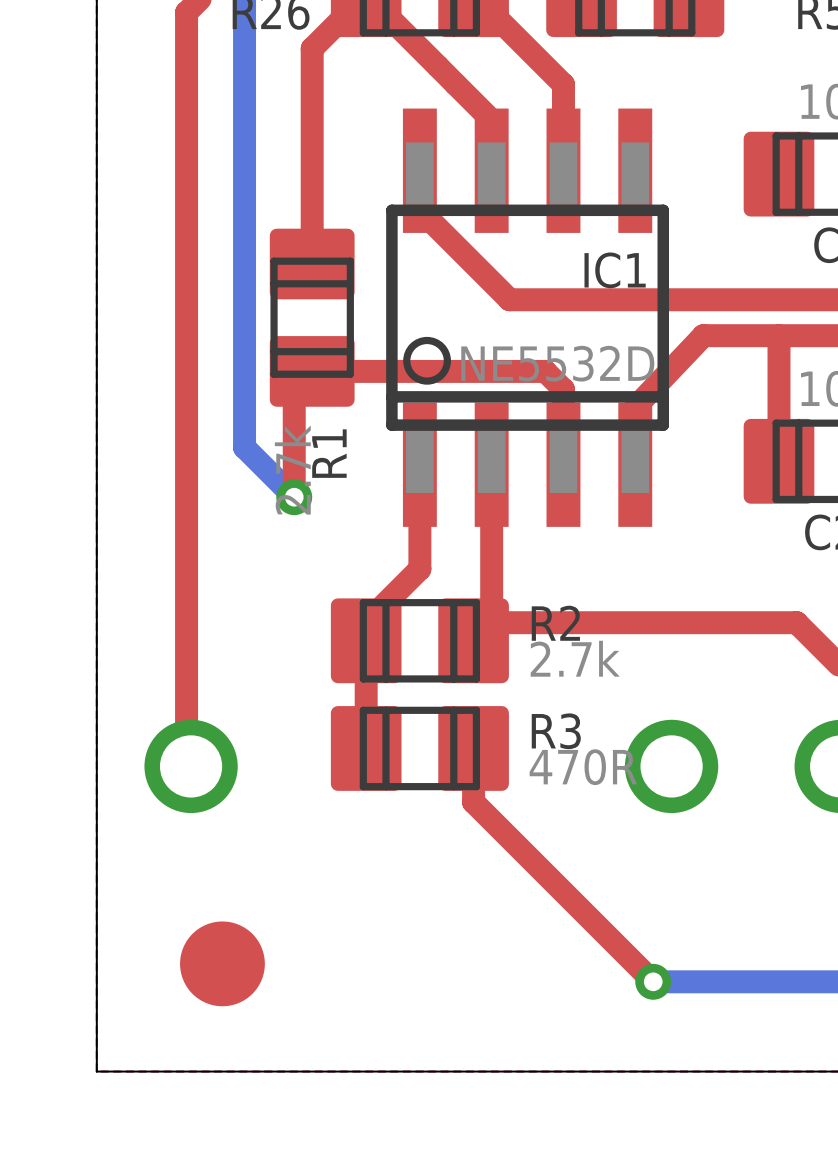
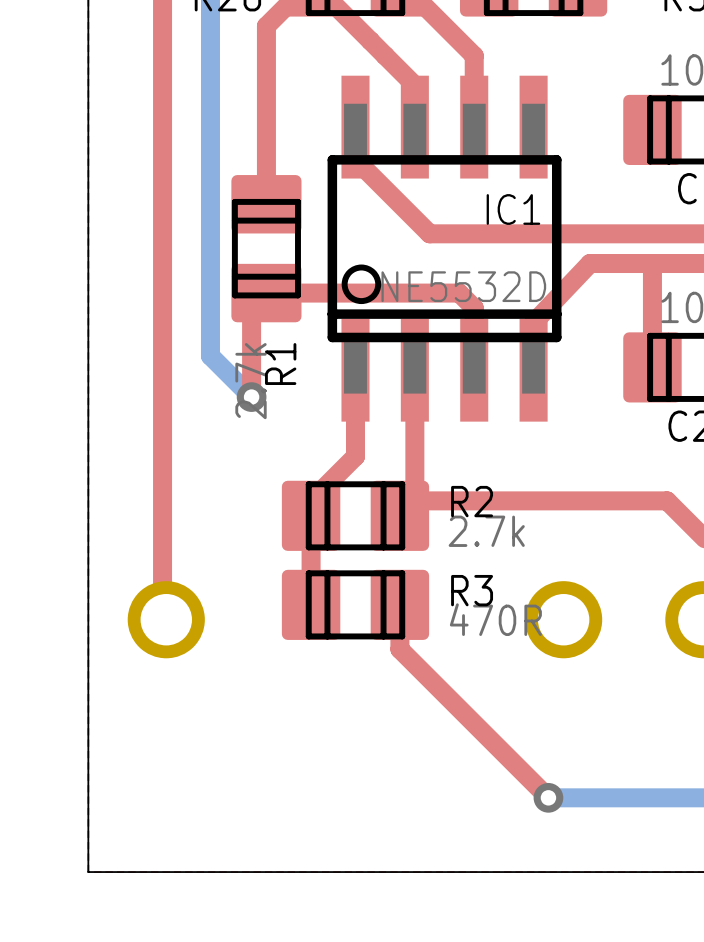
part: (222, 963) -> none

